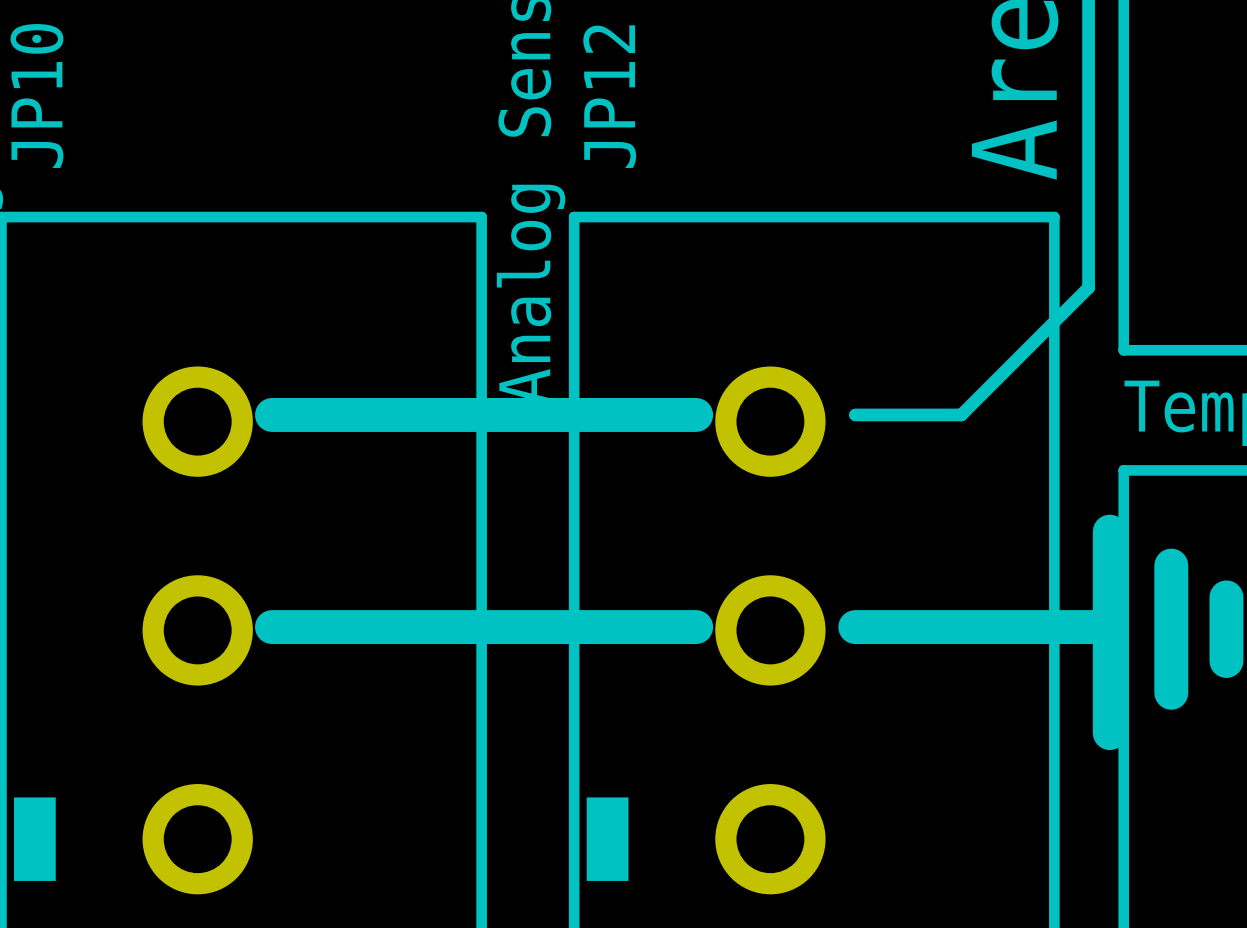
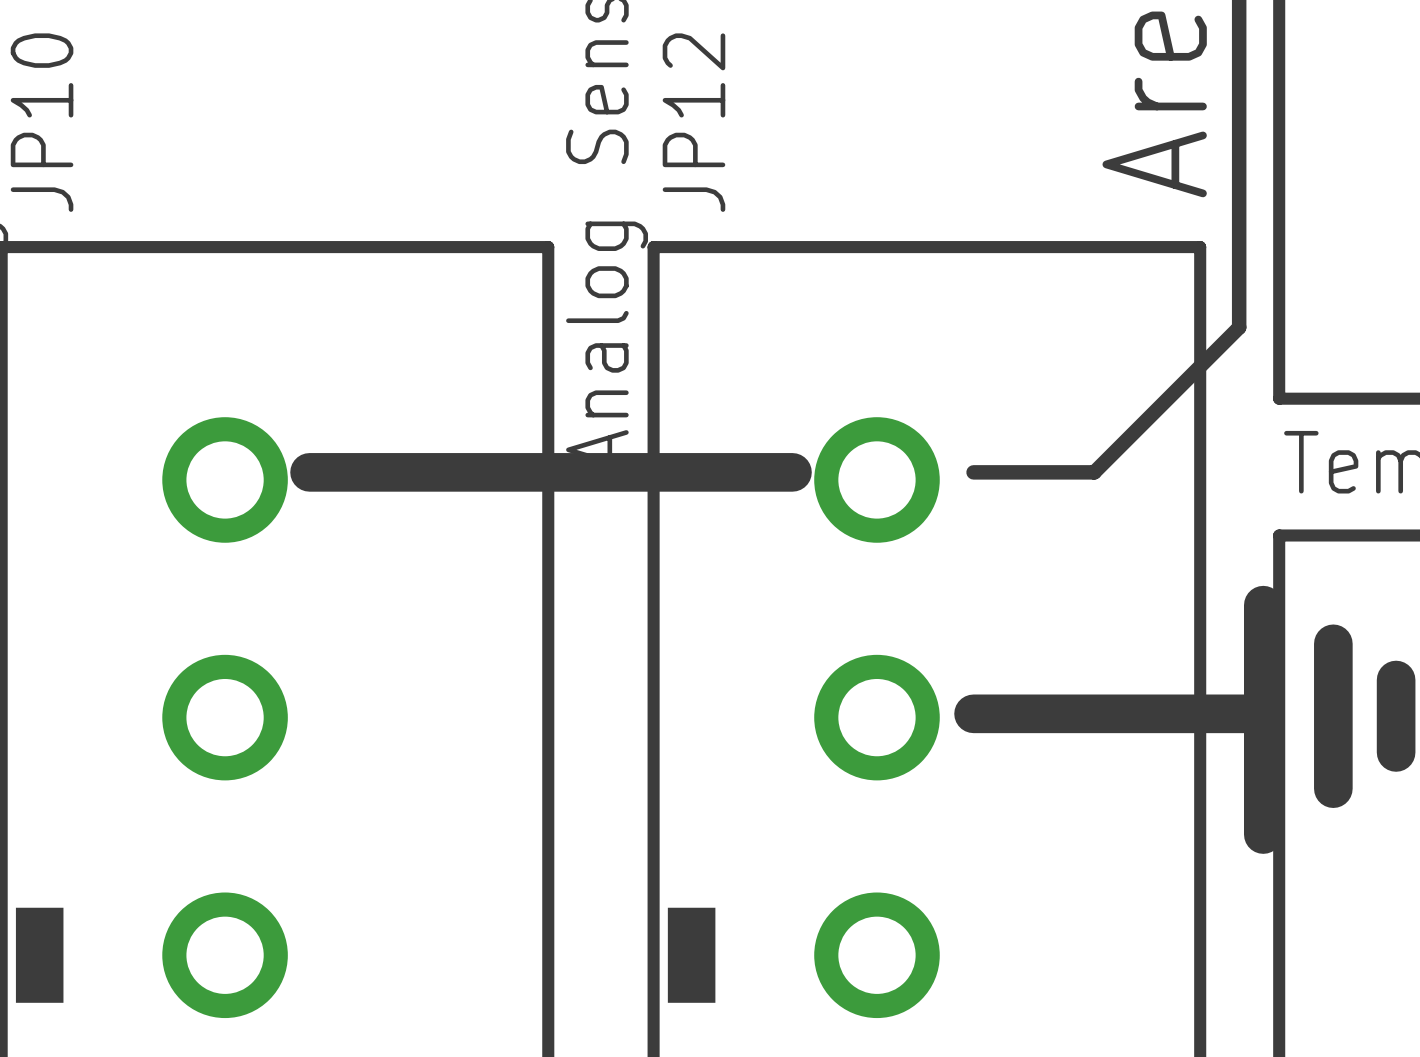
line: (271, 627) (696, 627) -> none

